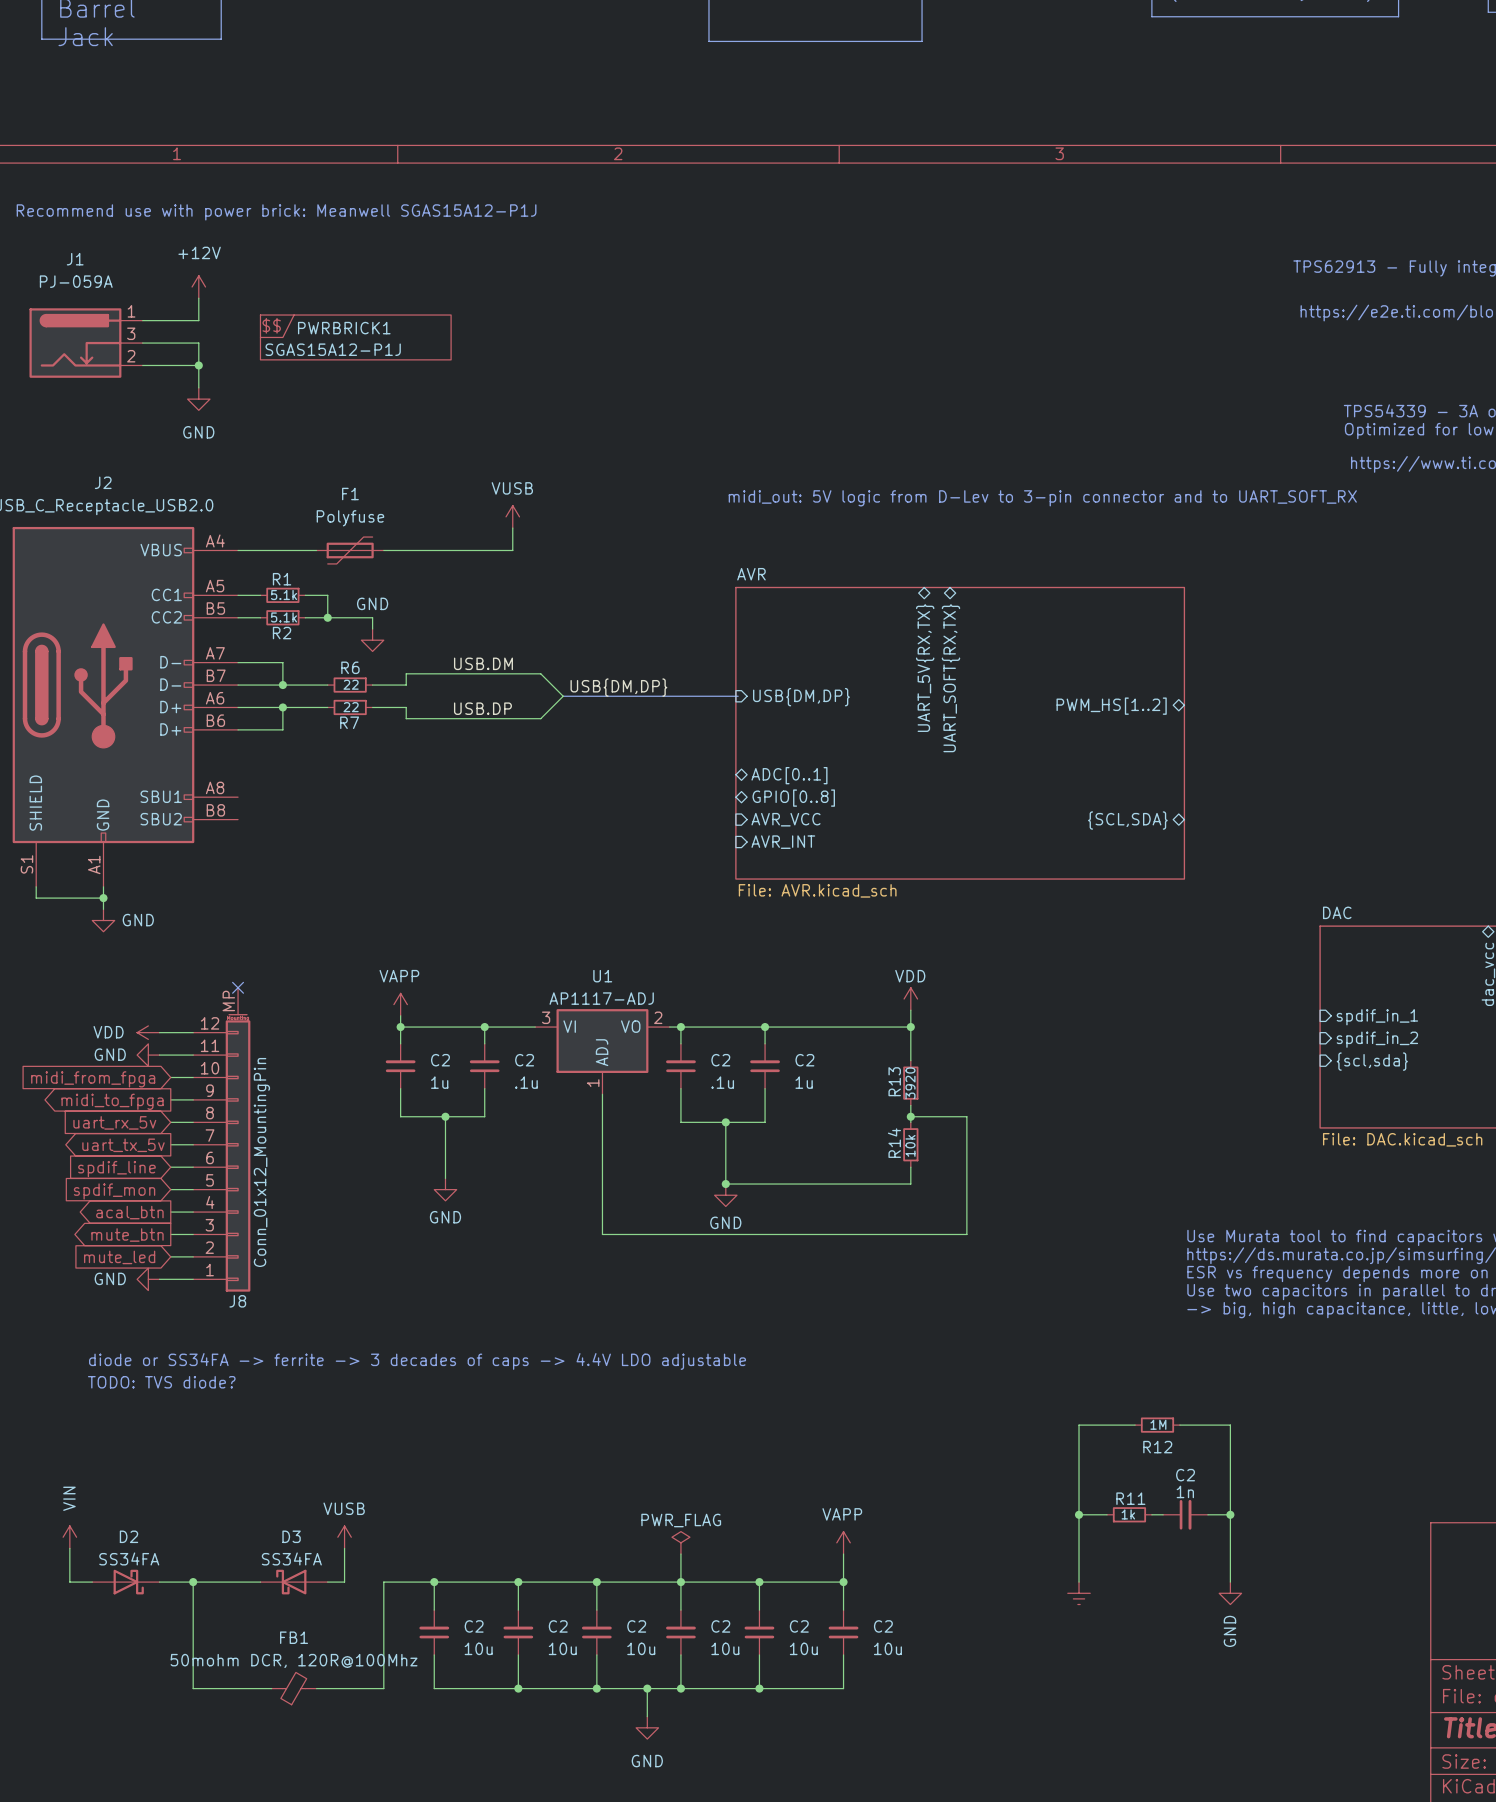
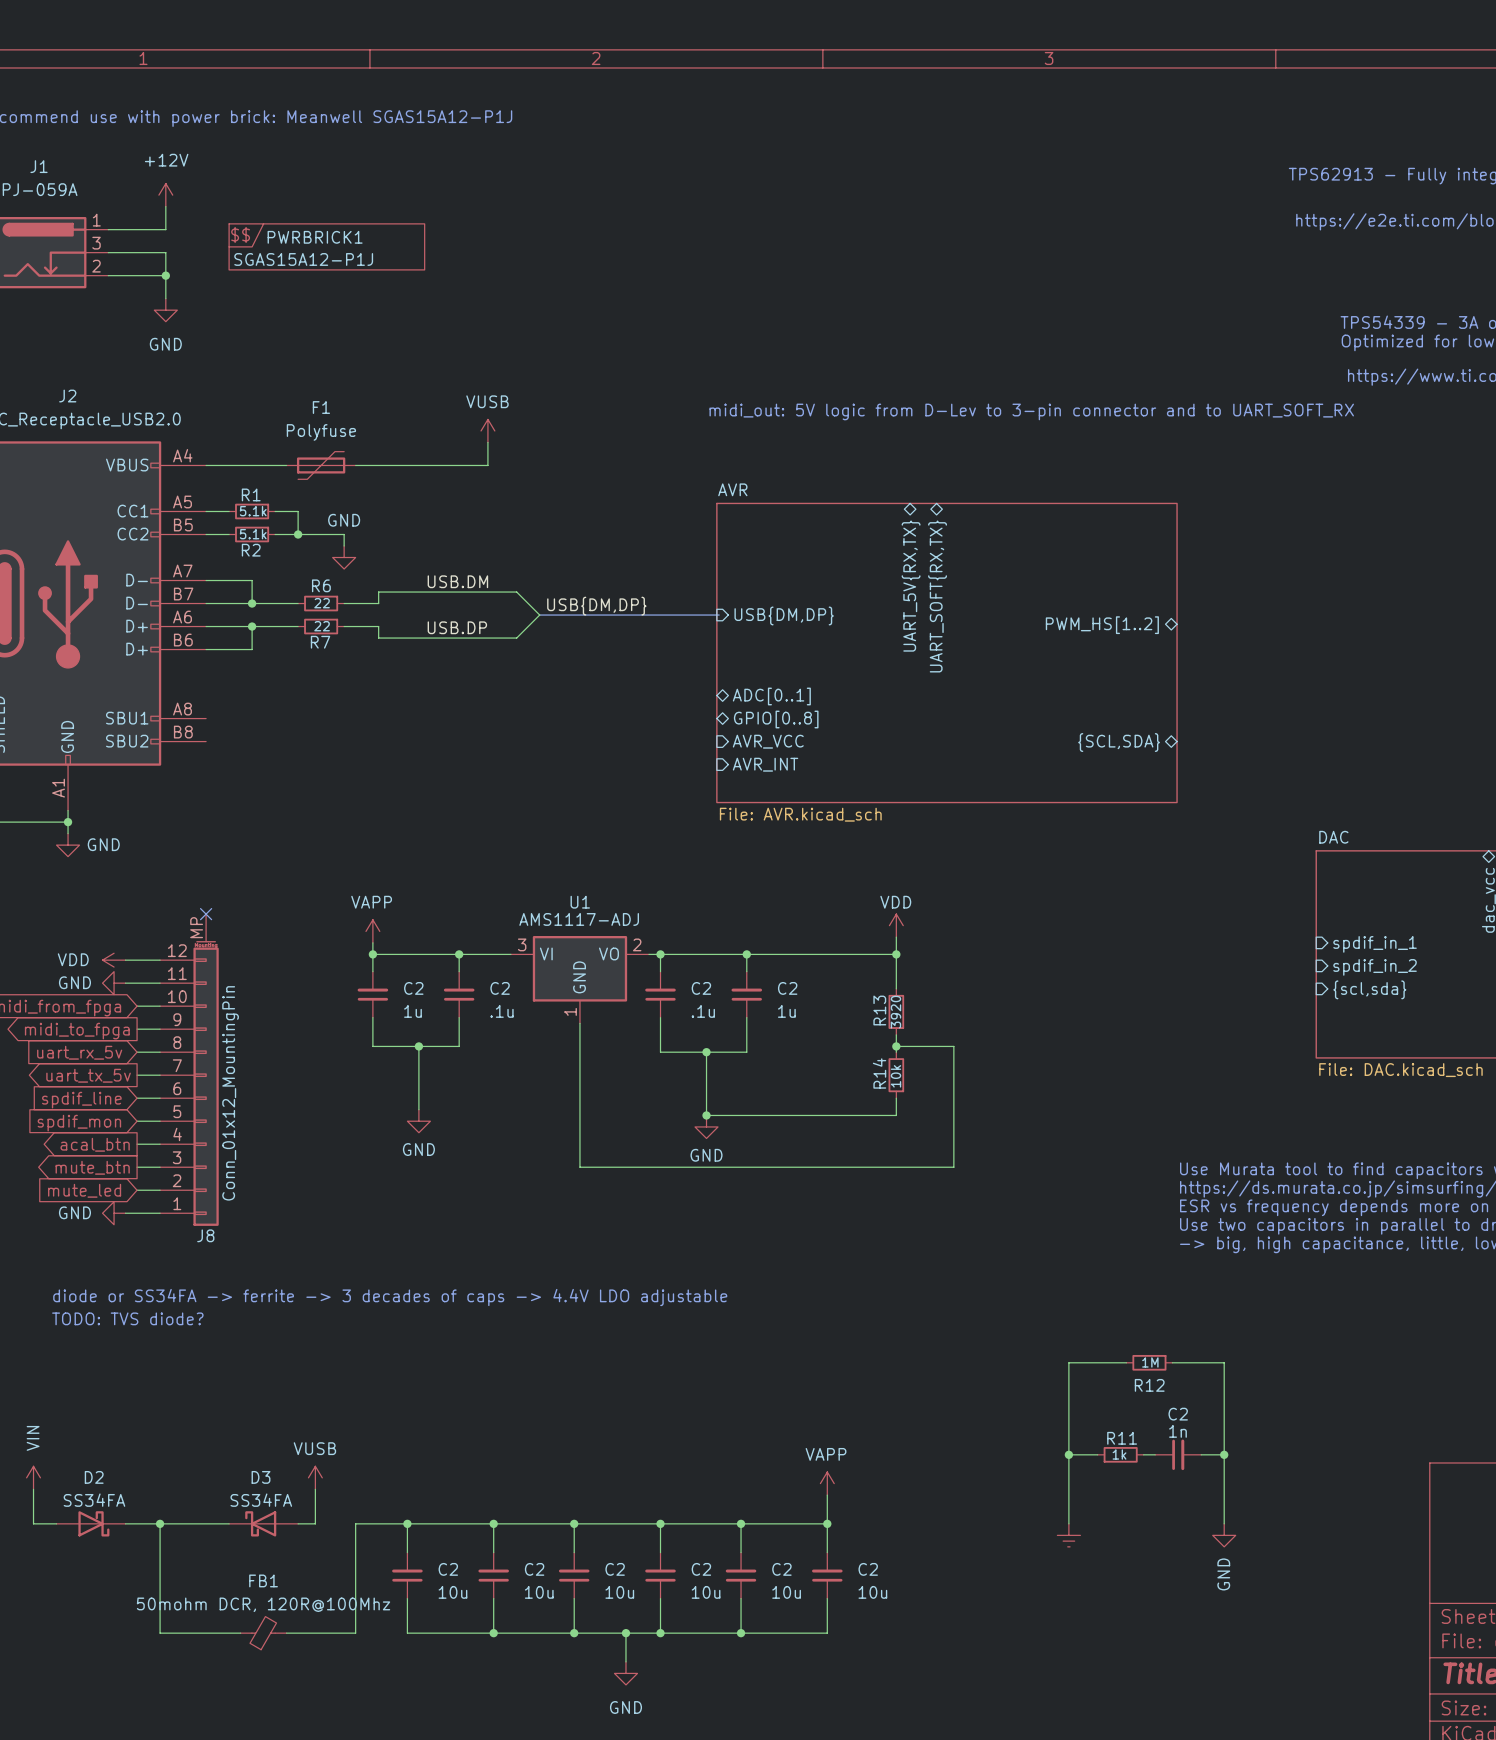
U1 value: AP1117-ADJ (601, 998) -> AMS1117-ADJ (579, 919)
U1 pin name: ADJ (602, 1052) -> GND (579, 977)
power symbol: PWR_FLAG (680, 1542) -> none
wire: (680, 1554) (680, 1582) -> none

